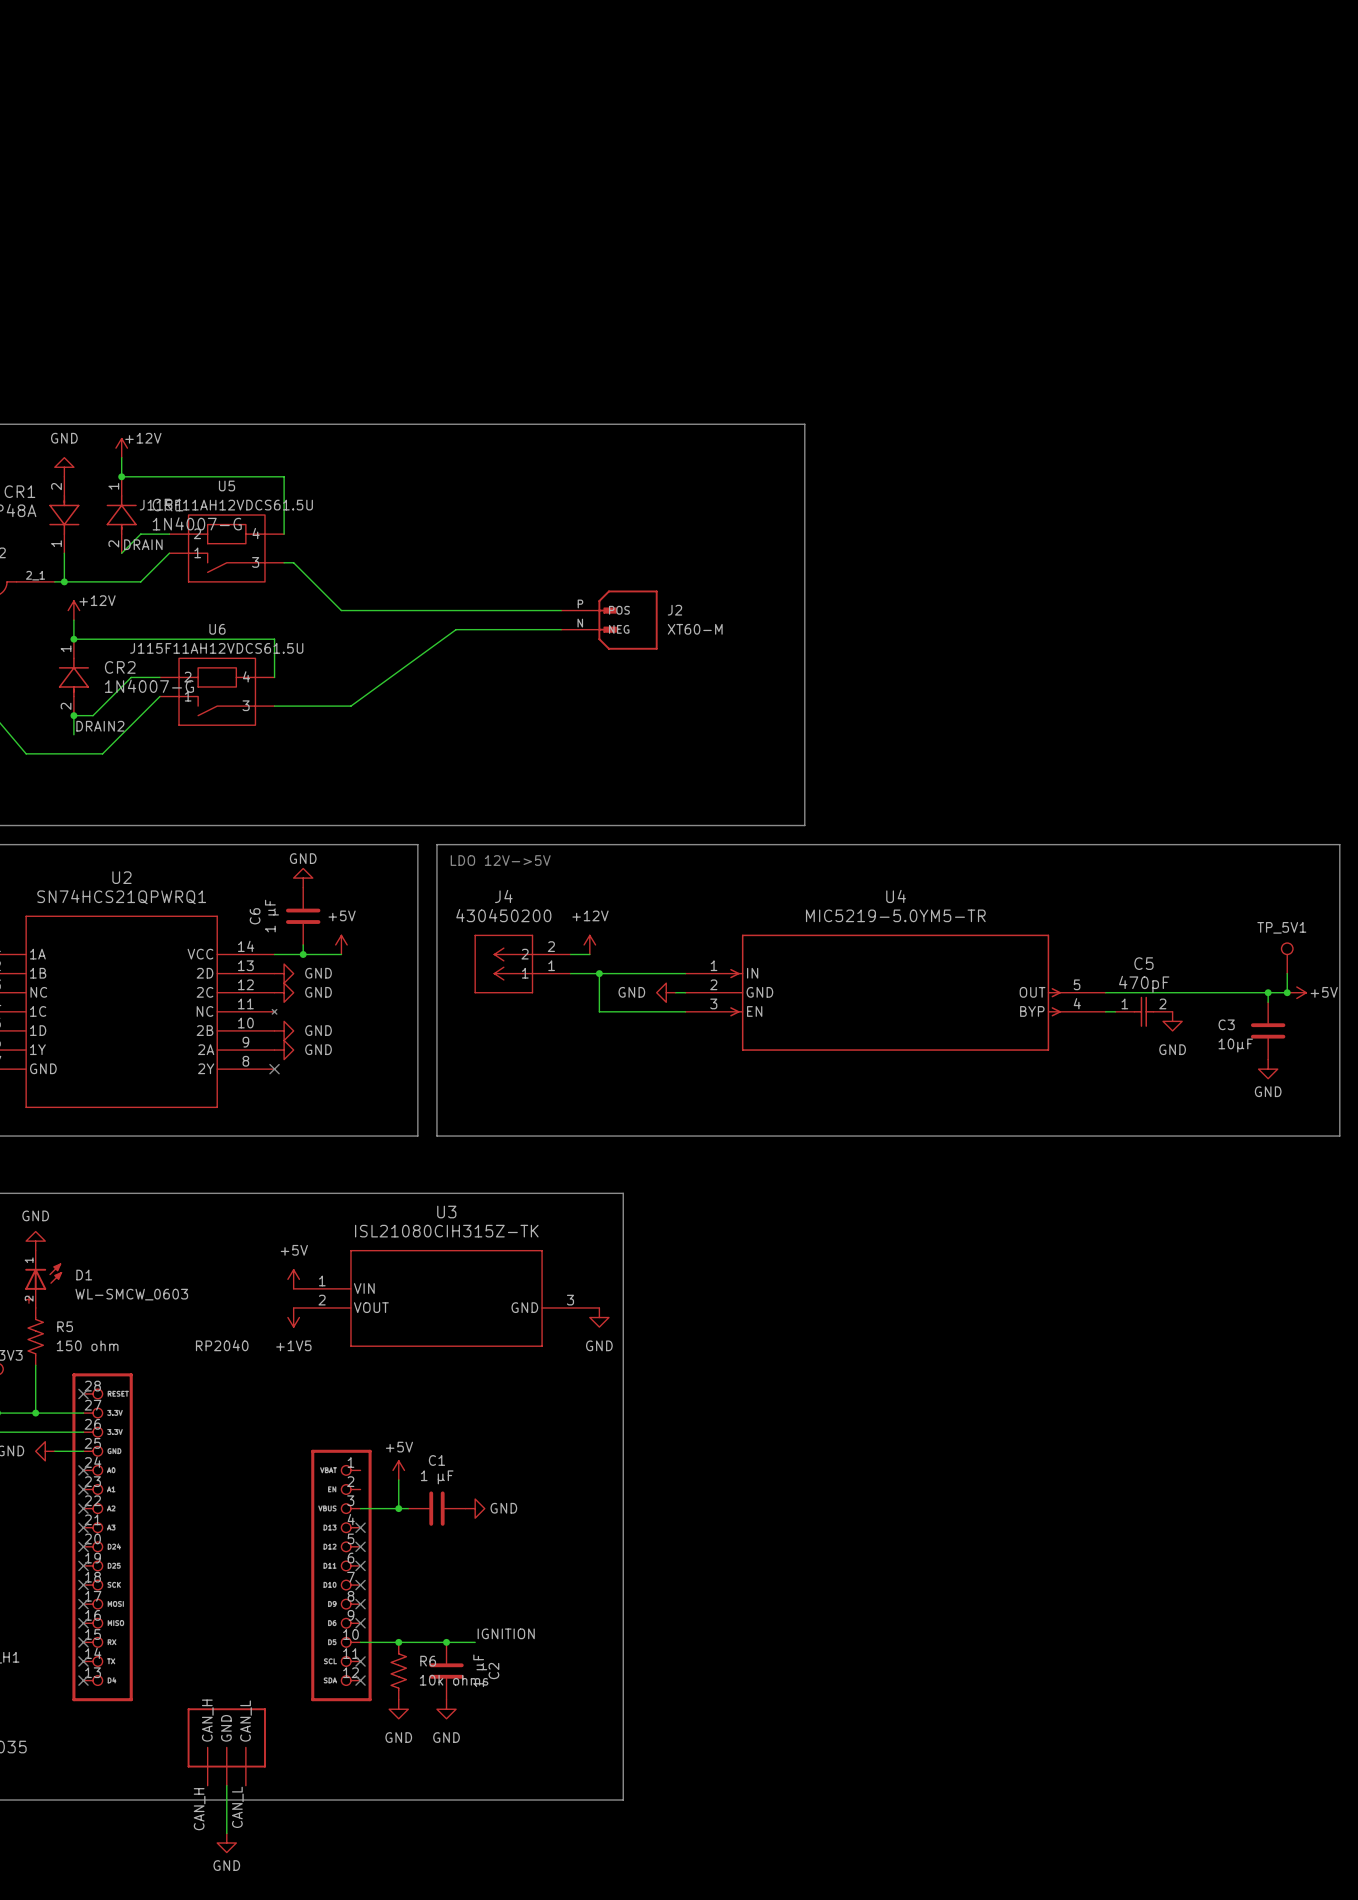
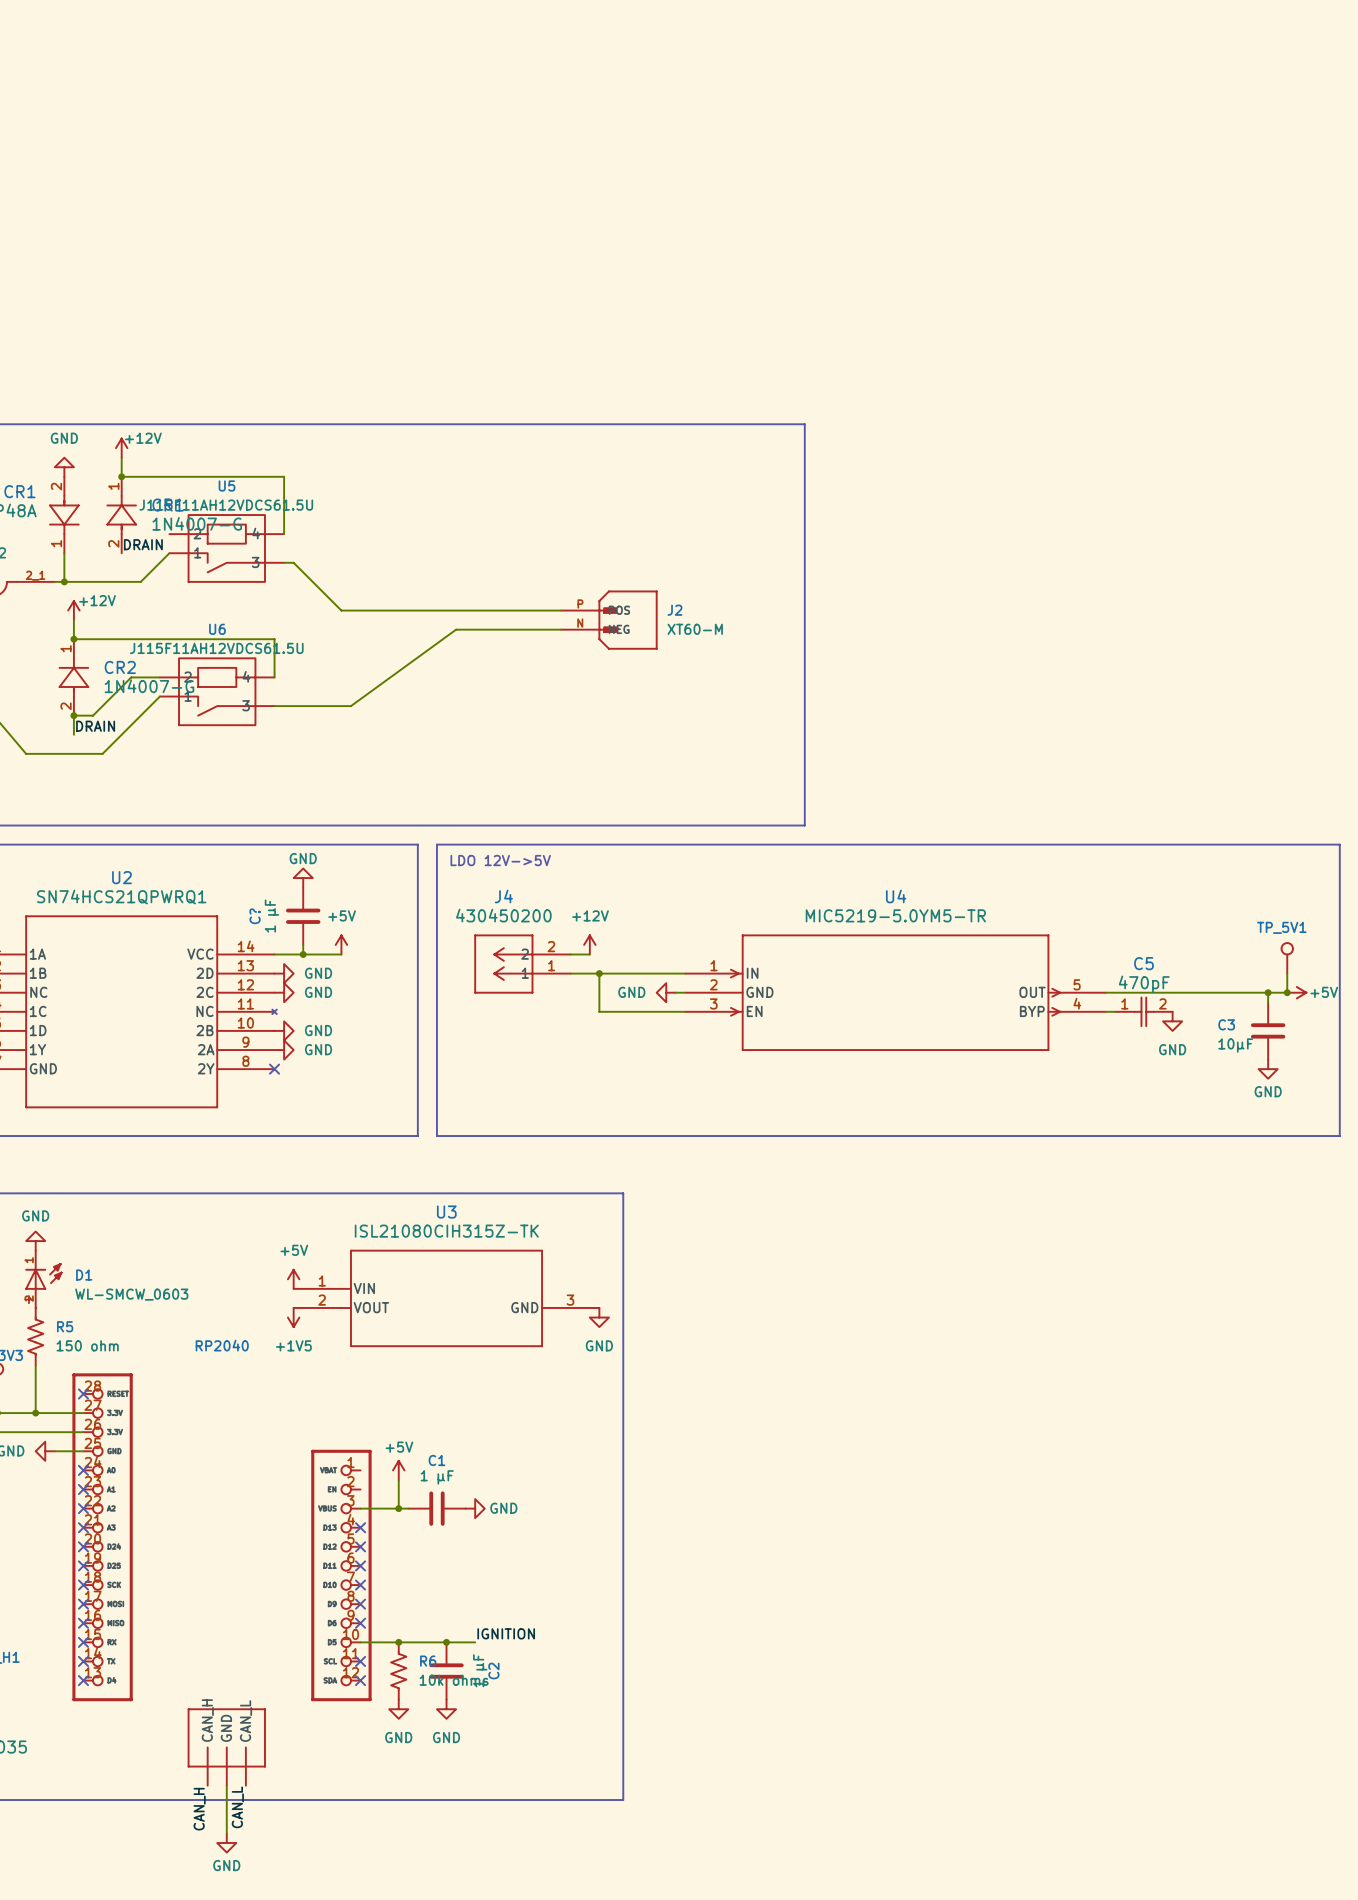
wire: (169, 534) (140, 534) (121, 553) -> none
label: DRAIN2 (100, 726) -> DRAIN (95, 726)
C6 name: C6 (255, 916) -> C? (255, 916)

